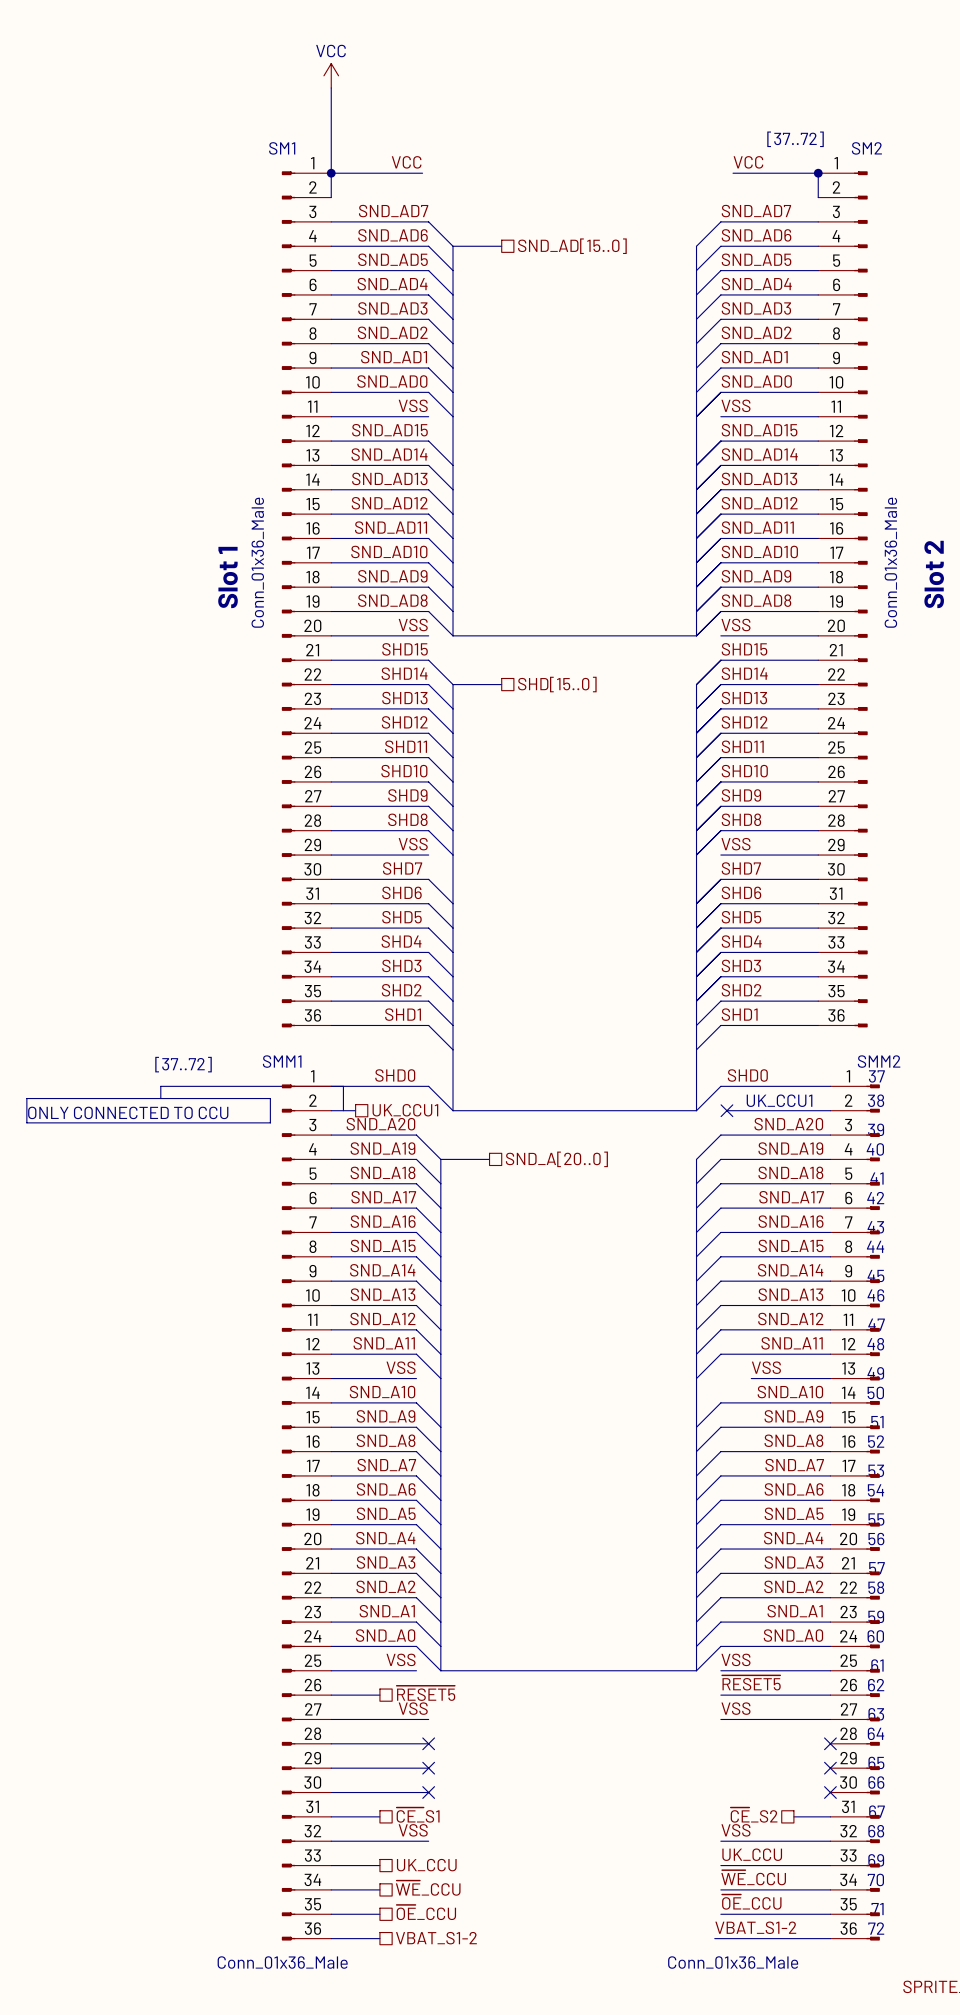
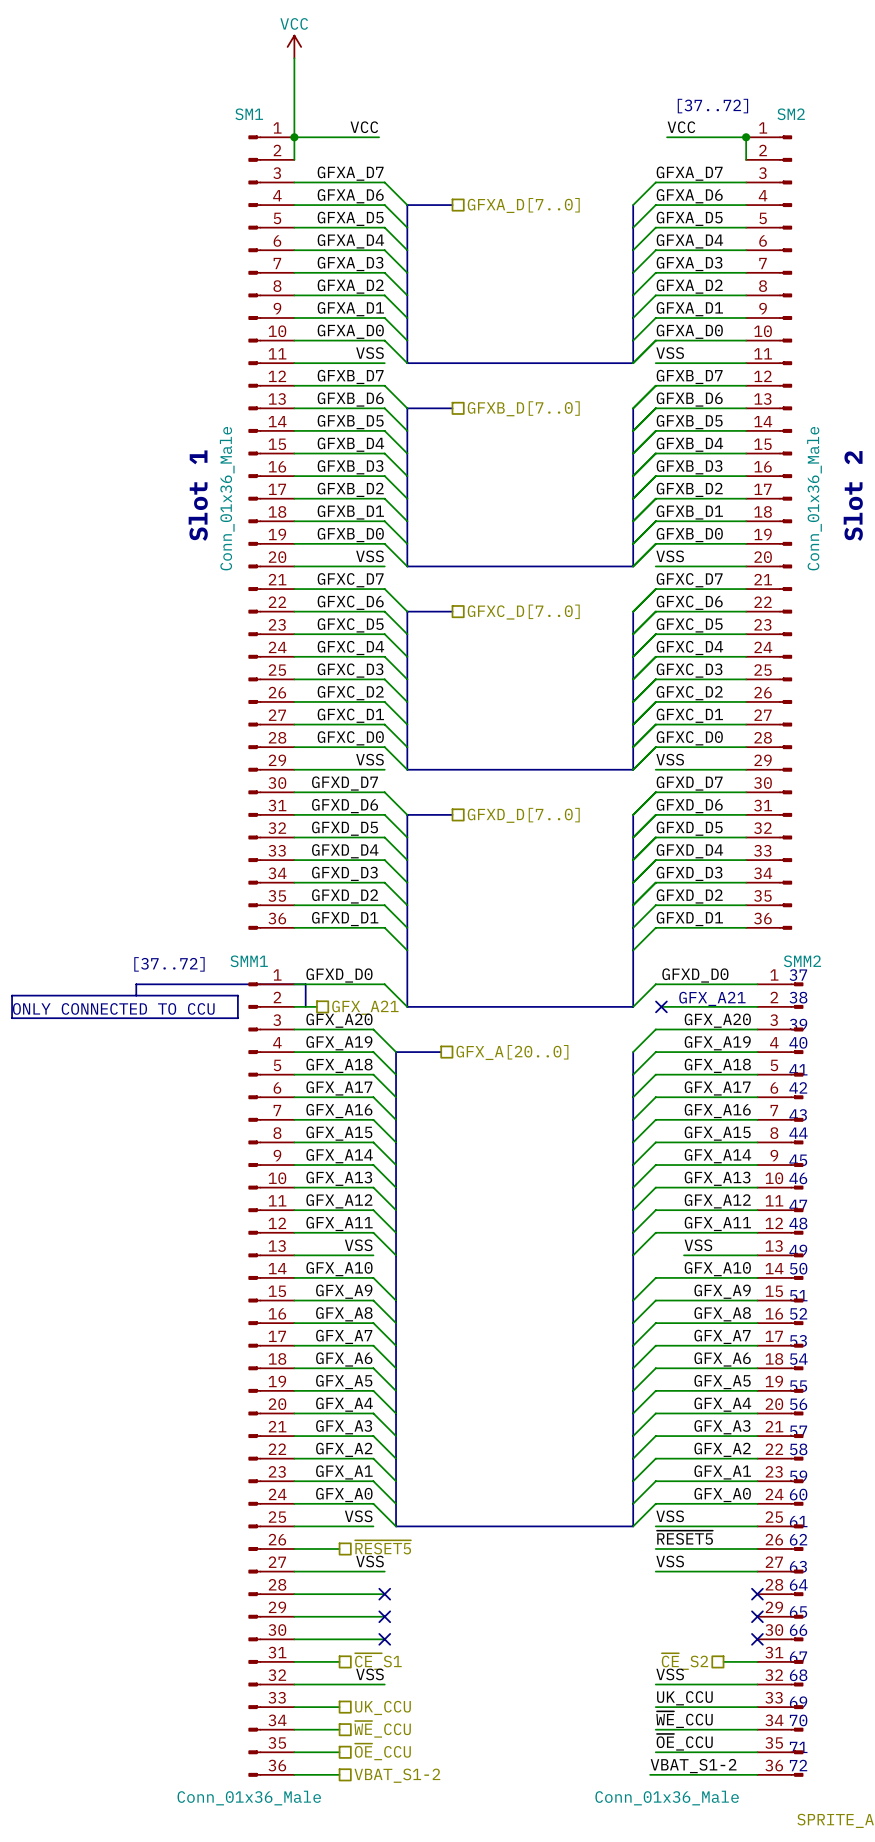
label: SND_AD7 (393, 211) -> GFXA_D7 (350, 173)
label: SND_AD7 (756, 211) -> GFXA_D7 (689, 173)
label: SND_AD6 (393, 235) -> GFXA_D6 (350, 196)
label: SND_AD6 (756, 235) -> GFXA_D6 (689, 196)
hierarchical label: SND_AD[15..0] (572, 246) -> GFXA_D[7..0] (523, 205)
label: SND_AD5 (393, 259) -> GFXA_D5 (350, 218)
label: SND_AD5 (756, 259) -> GFXA_D5 (689, 218)
label: SND_AD4 (392, 284) -> GFXA_D4 (350, 241)
label: SND_AD4 (756, 284) -> GFXA_D4 (689, 241)
label: SND_AD3 (392, 308) -> GFXA_D3 (350, 264)
label: SND_AD3 (756, 308) -> GFXA_D3 (689, 264)
label: SND_AD2 (392, 332) -> GFXA_D2 (350, 286)
label: SND_AD2 (756, 332) -> GFXA_D2 (689, 286)
label: SND_AD1 (394, 357) -> GFXA_D1 (350, 309)
label: SND_AD1 (754, 357) -> GFXA_D1 (689, 309)
label: SND_AD0 (392, 381) -> GFXA_D0 (350, 331)
label: SND_AD0 (756, 381) -> GFXA_D0 (689, 331)
bus: (453, 416) (453, 465) -> (452, 408) (407, 408)
bus: (696, 416) (696, 465) -> (633, 363) (407, 363)
label: SND_AD15 (389, 430) -> GFXB_D7 (350, 376)
label: SND_AD15 (759, 430) -> GFXB_D7 (689, 376)
label: SND_AD14 (389, 454) -> GFXB_D6 (350, 399)
label: SND_AD14 (759, 454) -> GFXB_D6 (689, 399)
hierarchical label: none -> GFXB_D[7..0] (523, 408)
label: SND_AD13 (389, 478) -> GFXB_D5 (350, 422)
label: SND_AD13 (759, 478) -> GFXB_D5 (689, 422)
label: SND_AD12 (389, 503) -> GFXB_D4 (350, 444)
label: SND_AD12 (759, 503) -> GFXB_D4 (689, 444)
label: SND_AD11 (391, 527) -> GFXB_D3 (350, 467)
label: SND_AD11 (757, 527) -> GFXB_D3 (689, 467)
label: SND_AD10 (389, 551) -> GFXB_D2 (350, 489)
label: SND_AD10 (759, 551) -> GFXB_D2 (689, 489)
label: SND_AD9 (392, 576) -> GFXB_D1 (350, 512)
label: SND_AD9 (756, 576) -> GFXB_D1 (689, 512)
label: SND_AD8 (392, 600) -> GFXB_D0 (350, 535)
label: SND_AD8 (756, 600) -> GFXB_D0 (689, 535)
label: SHD15 (405, 649) -> GFXC_D7 (350, 580)
label: SHD15 (744, 649) -> GFXC_D7 (689, 580)
label: SHD14 (404, 673) -> GFXC_D6 (350, 602)
label: SHD14 (744, 673) -> GFXC_D6 (689, 602)
hierarchical label: SHD[15..0] (557, 684) -> GFXC_D[7..0] (523, 612)
label: SHD13 (404, 698) -> GFXC_D5 (350, 625)
label: SHD13 (744, 698) -> GFXC_D5 (689, 625)
label: SHD12 (404, 722) -> GFXC_D4 (350, 647)
label: SHD12 (744, 722) -> GFXC_D4 (689, 647)
label: SHD11 (406, 746) -> GFXC_D3 (350, 670)
label: SHD11 (742, 746) -> GFXC_D3 (689, 670)
label: SHD10 (404, 771) -> GFXC_D2 (350, 693)
label: SHD10 (744, 771) -> GFXC_D2 (689, 693)
label: SHD9 (407, 795) -> GFXC_D1 (350, 715)
label: SHD9 (741, 795) -> GFXC_D1 (689, 715)
label: SHD8 (407, 819) -> GFXC_D0 (350, 738)
label: SHD8 (741, 819) -> GFXC_D0 (689, 738)
bus: (453, 855) (453, 903) -> (452, 814) (407, 814)
bus: (696, 855) (696, 903) -> (633, 769) (407, 769)
label: SHD7 (402, 868) -> GFXD_D7 (345, 783)
label: SHD7 (741, 868) -> GFXD_D7 (689, 783)
label: SHD6 (401, 892) -> GFXD_D6 (345, 806)
label: SHD6 (741, 892) -> GFXD_D6 (689, 806)
hierarchical label: none -> GFXD_D[7..0] (523, 815)
label: SHD5 (401, 917) -> GFXD_D5 (345, 828)
label: SHD5 (741, 917) -> GFXD_D5 (689, 828)
label: SHD4 (401, 941) -> GFXD_D4 (345, 851)
label: SHD4 (741, 941) -> GFXD_D4 (689, 851)
label: SHD3 (401, 965) -> GFXD_D3 (344, 873)
label: SHD3 (741, 965) -> GFXD_D3 (689, 873)
label: SHD2 (401, 990) -> GFXD_D2 (345, 896)
label: SHD2 (741, 990) -> GFXD_D2 (689, 896)
label: SHD1 (403, 1014) -> GFXD_D1 (345, 919)
label: SHD1 (739, 1014) -> GFXD_D1 (689, 919)
label: SHD0 (395, 1075) -> GFXD_D0 (339, 975)
label: SHD0 (747, 1075) -> GFXD_D0 (695, 975)
text: UK_CCU1 (779, 1100) -> GFX_A21 (712, 998)
hierarchical label: UK_CCU1 (405, 1110) -> GFX_A21 (365, 1007)
label: SND_A20 (380, 1124) -> GFX_A20 (339, 1020)
label: SND_A20 (788, 1124) -> GFX_A20 (717, 1020)
label: SND_A19 (382, 1148) -> GFX_A19 (339, 1043)
label: SND_A19 (790, 1148) -> GFX_A19 (717, 1043)
hierarchical label: SND_A[20..0] (556, 1159) -> GFX_A[20..0] (512, 1052)
label: SND_A18 (383, 1172) -> GFX_A18 (339, 1065)
label: SND_A18 (790, 1172) -> GFX_A18 (717, 1065)
label: SND_A17 (383, 1197) -> GFX_A17 (339, 1088)
label: SND_A17 (791, 1197) -> GFX_A17 (717, 1088)
label: SND_A16 (383, 1221) -> GFX_A16 (339, 1111)
label: SND_A16 (791, 1221) -> GFX_A16 (717, 1111)
label: SND_A15 (383, 1245) -> GFX_A15 (339, 1133)
label: SND_A15 (791, 1245) -> GFX_A15 (717, 1133)
label: SND_A14 (382, 1270) -> GFX_A14 (339, 1156)
label: SND_A14 (790, 1270) -> GFX_A14 (717, 1156)
label: SND_A13 (383, 1294) -> GFX_A13 (339, 1178)
label: SND_A13 (790, 1294) -> GFX_A13 (717, 1178)
label: SND_A12 (382, 1318) -> GFX_A12 (339, 1201)
label: SND_A12 (790, 1318) -> GFX_A12 (717, 1201)
label: SND_A11 (384, 1343) -> GFX_A11 (339, 1223)
label: SND_A11 (792, 1343) -> GFX_A11 (717, 1223)
label: SND_A10 (382, 1392) -> GFX_A10 (339, 1269)
label: SND_A10 (790, 1392) -> GFX_A10 (717, 1269)
label: SND_A9 (386, 1416) -> GFX_A9 (344, 1291)
label: SND_A9 (793, 1416) -> GFX_A9 (722, 1291)
label: SND_A8 (386, 1440) -> GFX_A8 (344, 1314)
label: SND_A8 (793, 1440) -> GFX_A8 (722, 1314)
label: SND_A7 (386, 1465) -> GFX_A7 (344, 1336)
label: SND_A7 (794, 1465) -> GFX_A7 (722, 1336)
label: SND_A6 (386, 1489) -> GFX_A6 (344, 1359)
label: SND_A6 (794, 1489) -> GFX_A6 (722, 1359)
label: SND_A5 (386, 1513) -> GFX_A5 (344, 1382)
label: SND_A5 (794, 1513) -> GFX_A5 (722, 1382)
label: SND_A4 (385, 1538) -> GFX_A4 (344, 1404)
label: SND_A4 (793, 1538) -> GFX_A4 (722, 1404)
label: SND_A3 (386, 1562) -> GFX_A3 (344, 1427)
label: SND_A3 (793, 1562) -> GFX_A3 (722, 1427)
label: SND_A2 (385, 1586) -> GFX_A2 (344, 1449)
label: SND_A2 (793, 1586) -> GFX_A2 (722, 1449)
label: SND_A1 (387, 1611) -> GFX_A1 (344, 1472)
label: SND_A1 (795, 1611) -> GFX_A1 (722, 1472)
label: SND_A0 (385, 1635) -> GFX_A0 (344, 1495)
label: SND_A0 (793, 1635) -> GFX_A0 (722, 1495)

